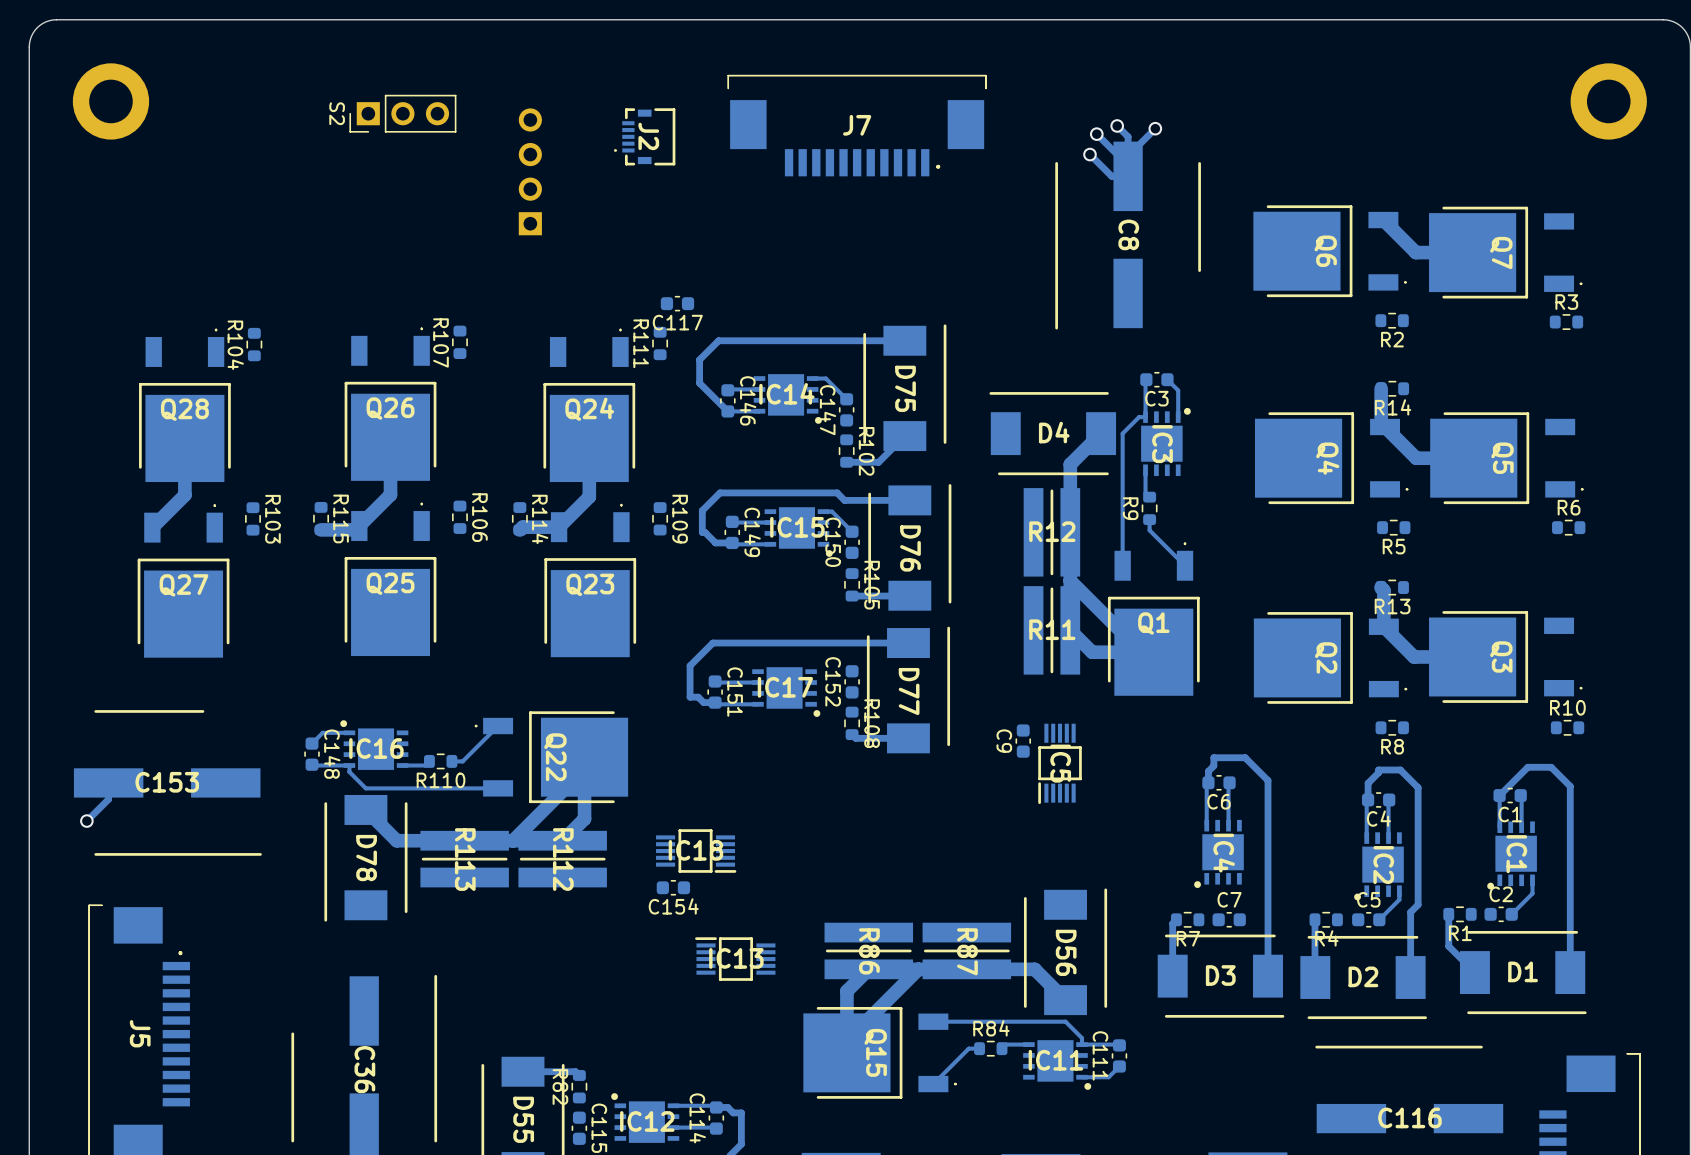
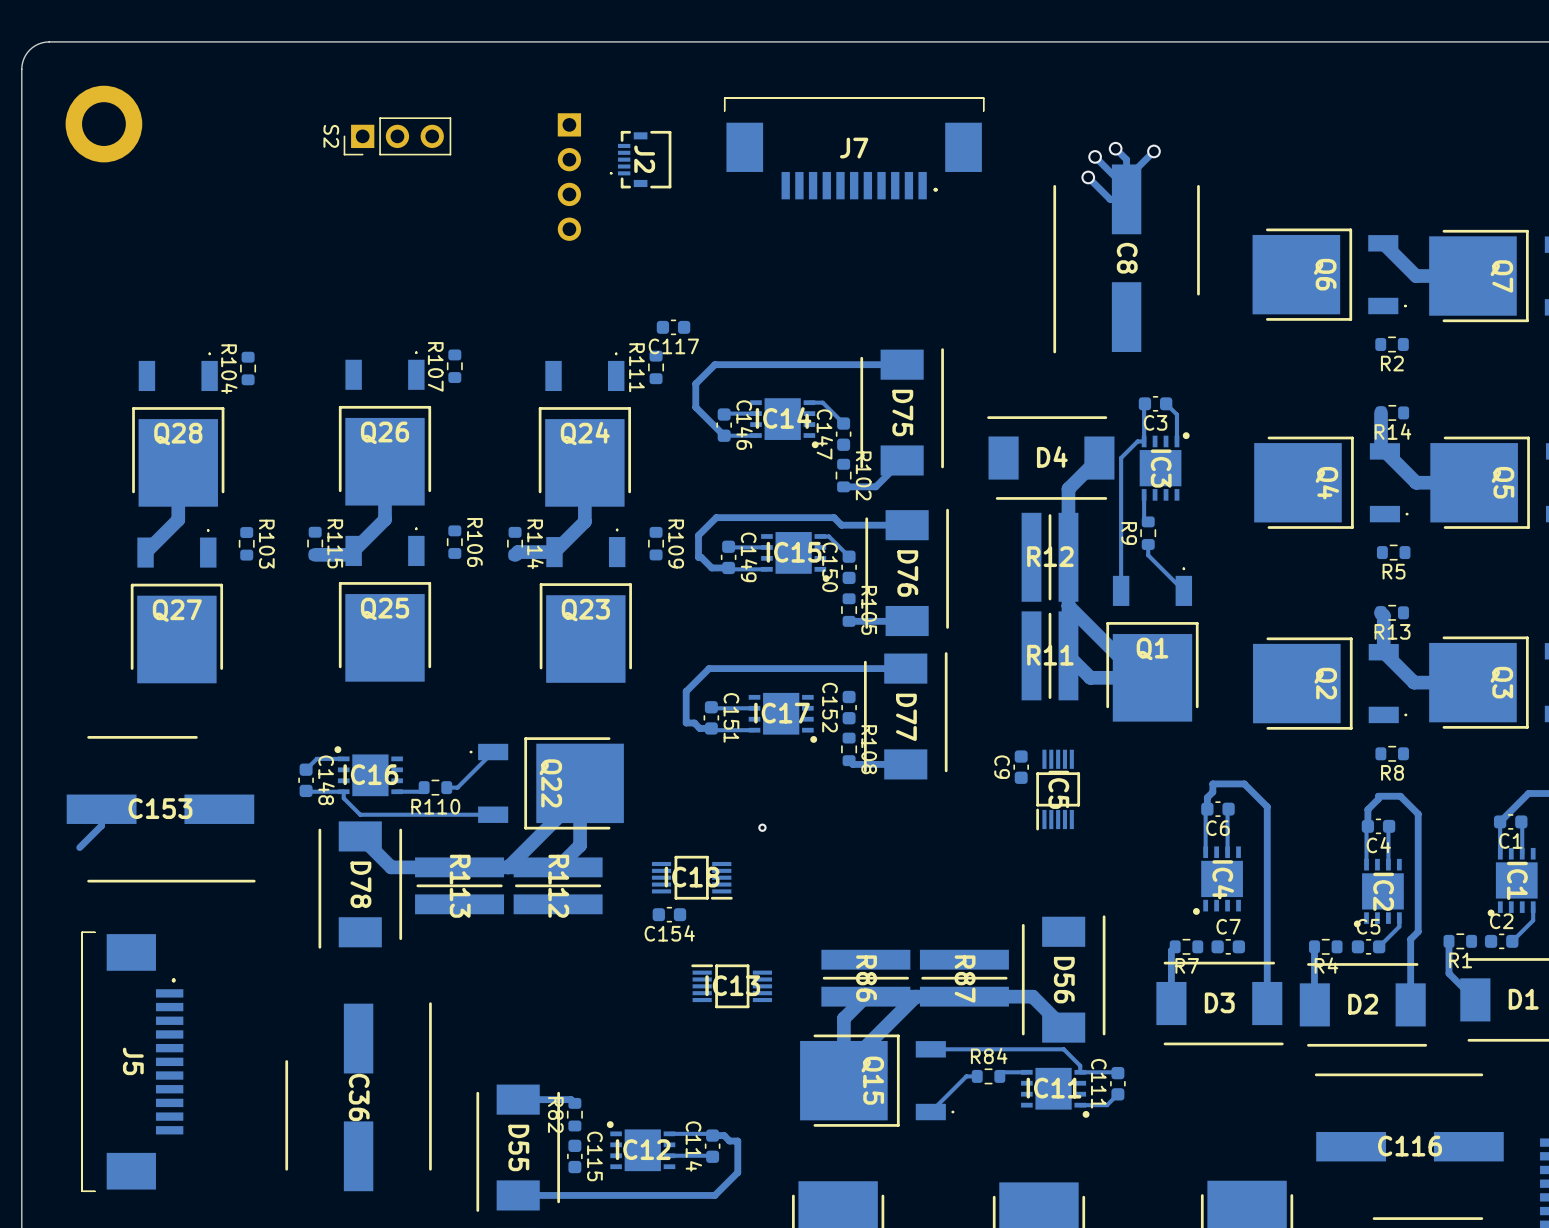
part rotation: 0° (530, 171) -> 180° (569, 177)
via: none -> (762, 827)
via: (86, 821) -> none

